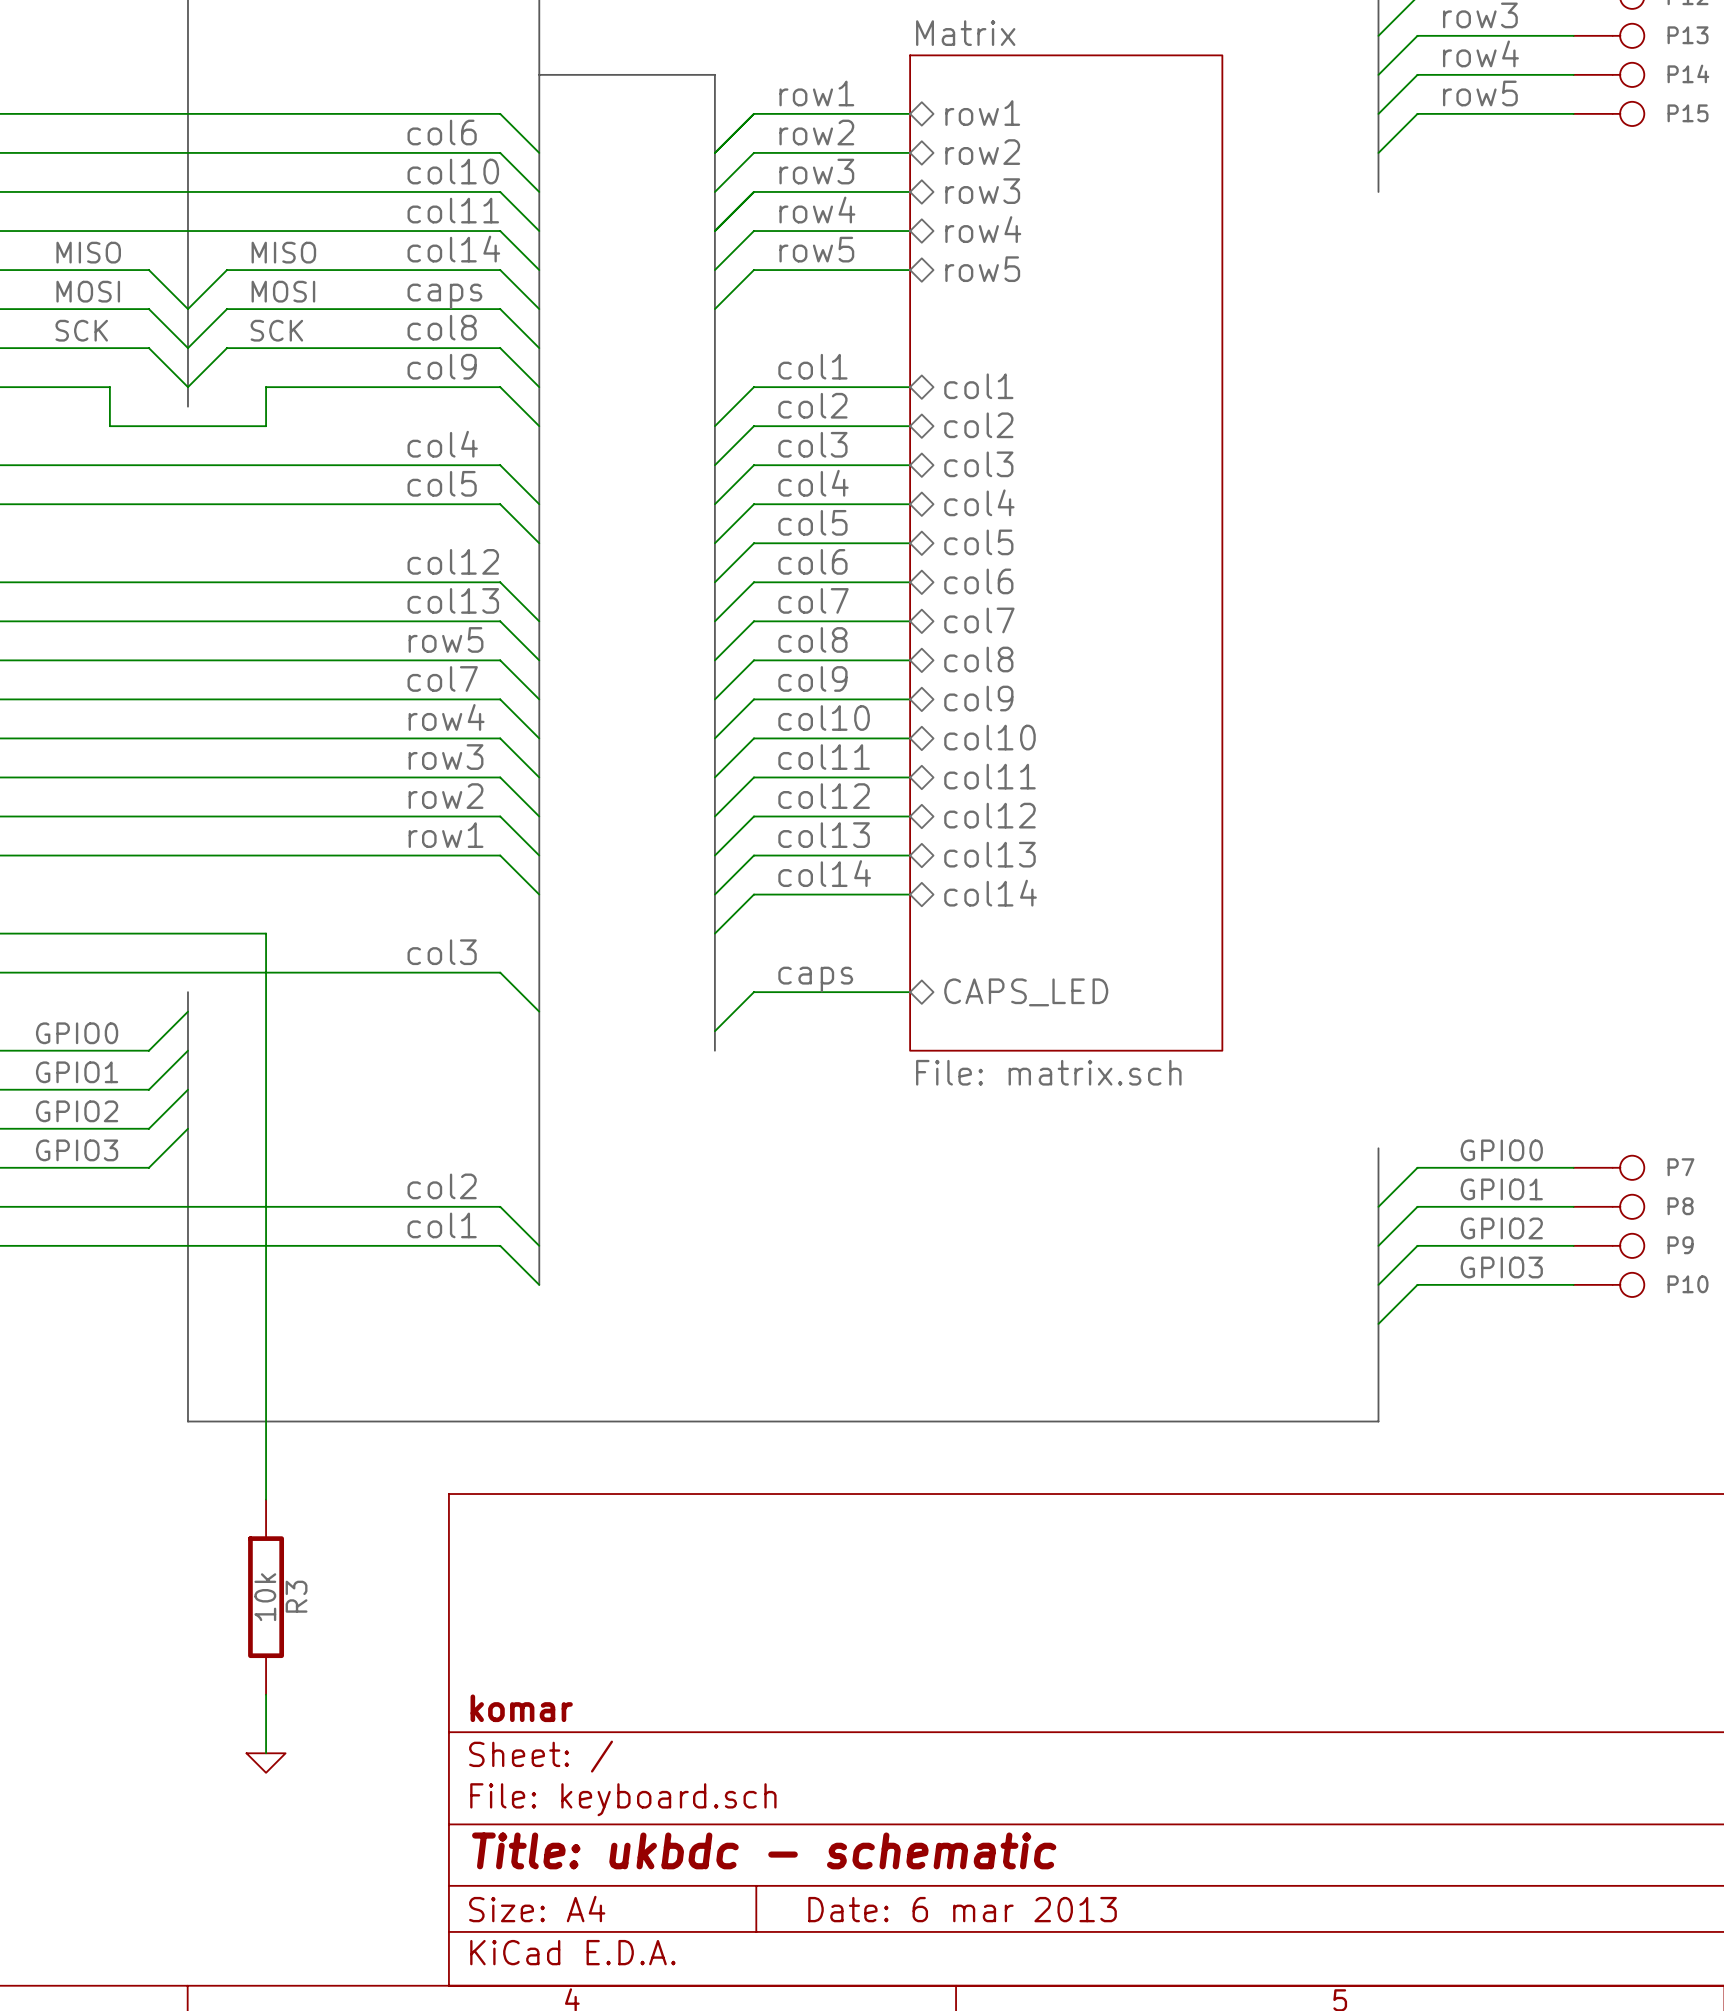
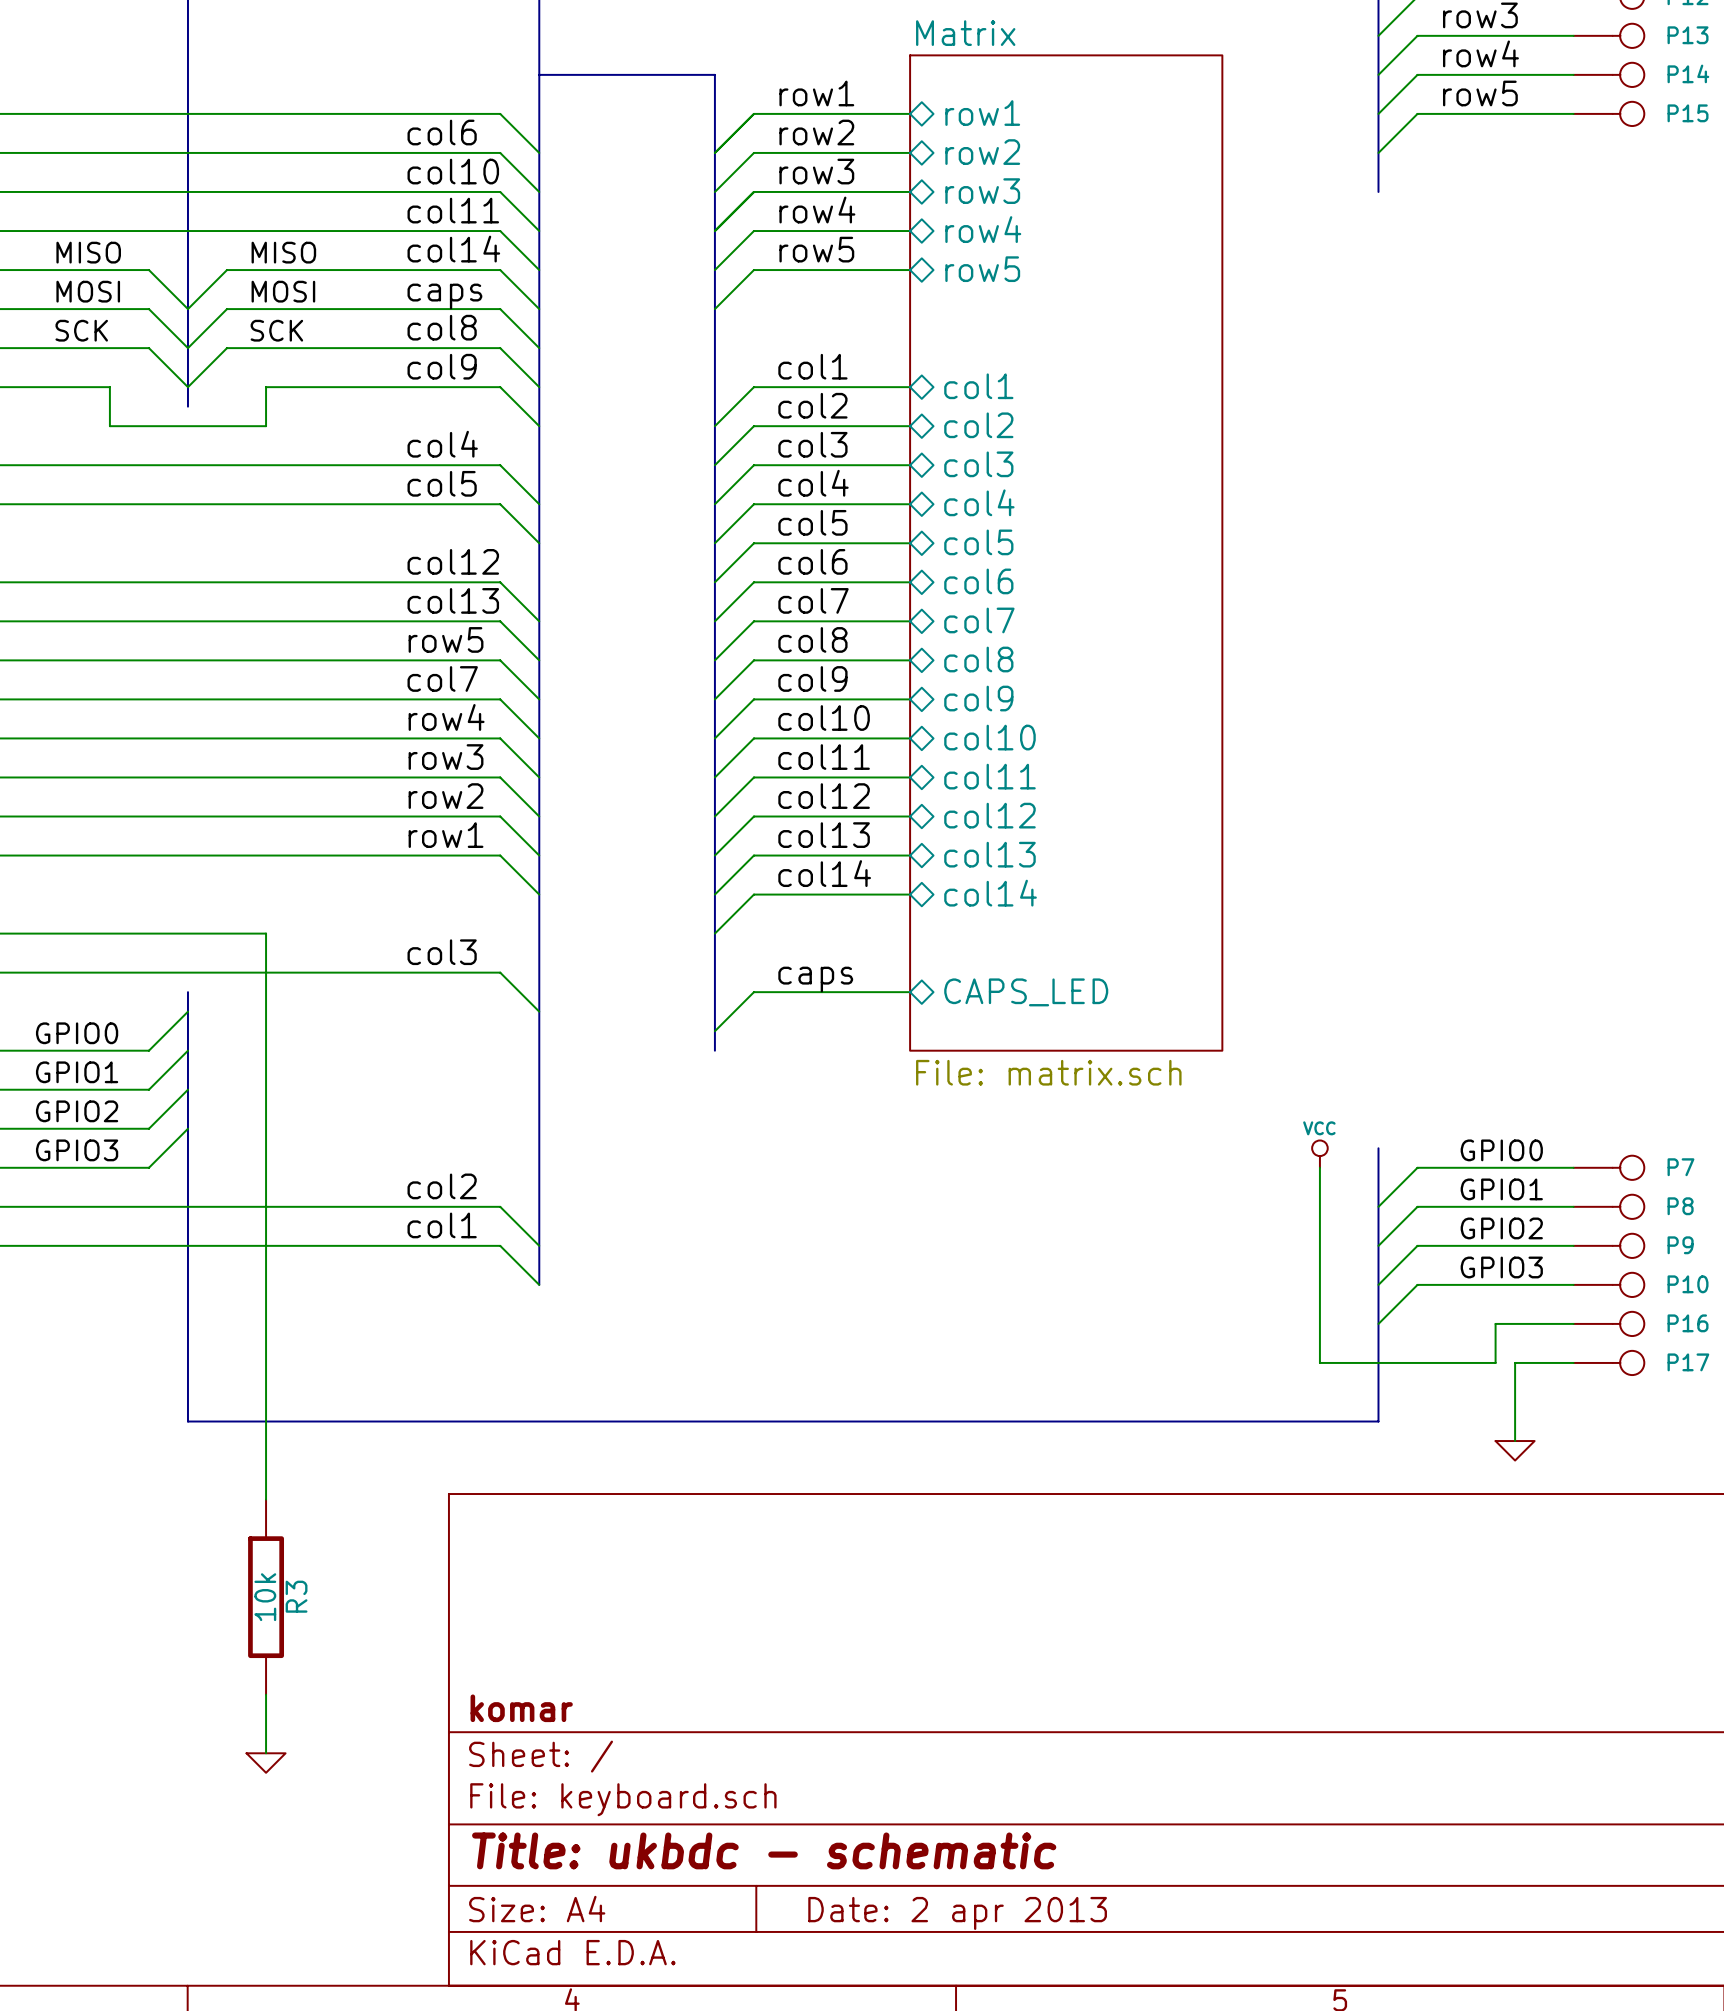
power symbol: none -> VCC (1319, 1154)
wire: none -> (1319, 1167) (1319, 1362) (1495, 1362) (1495, 1323) (1573, 1323)
P16: none -> (1608, 1323)
wire: none -> (1573, 1362) (1515, 1362) (1515, 1441)
P17: none -> (1608, 1362)
power symbol: none -> (1515, 1450)
title block: Date: 6 mar 2013 (962, 1909) -> Date: 2 apr 2013 (957, 1913)

